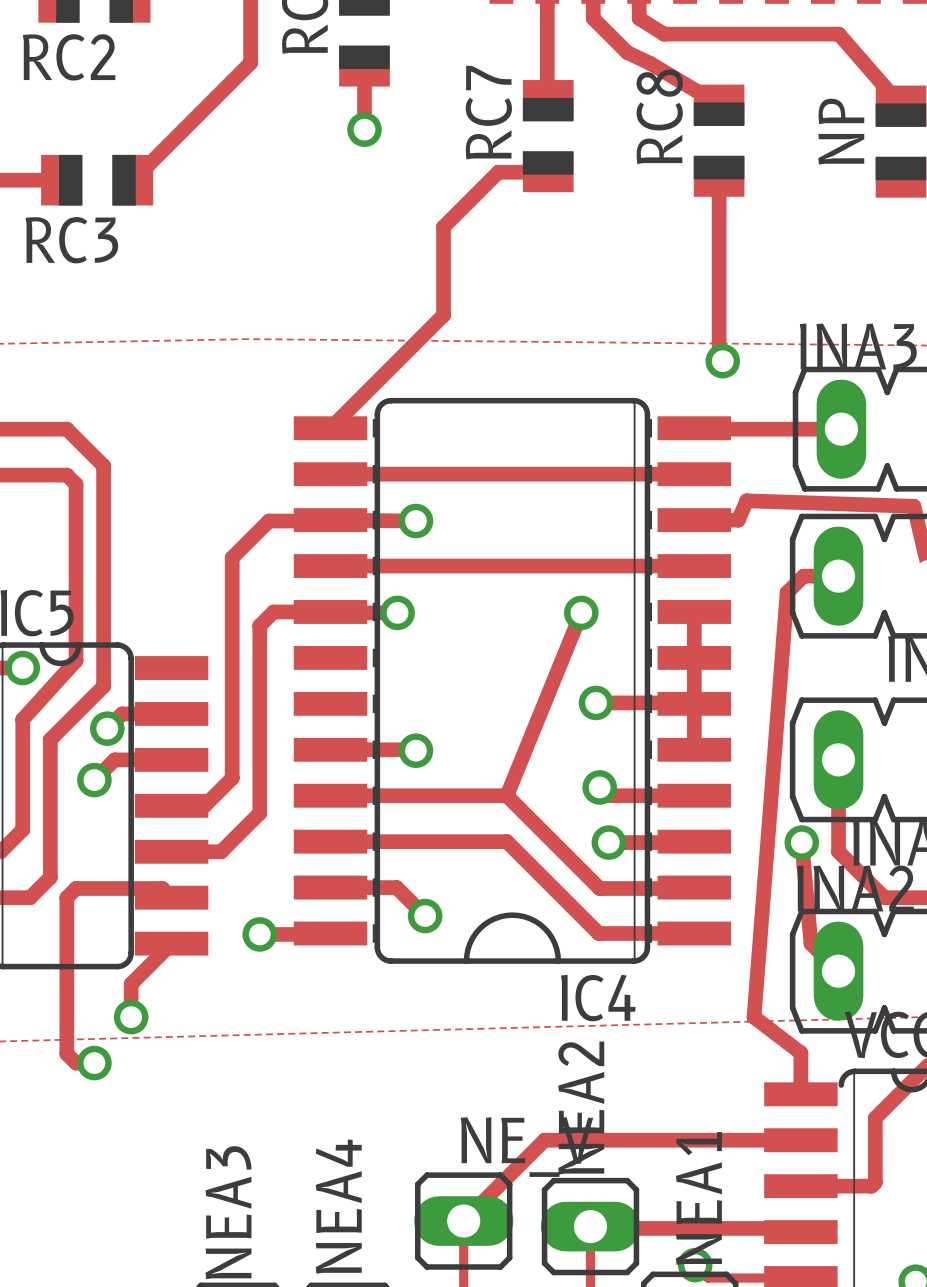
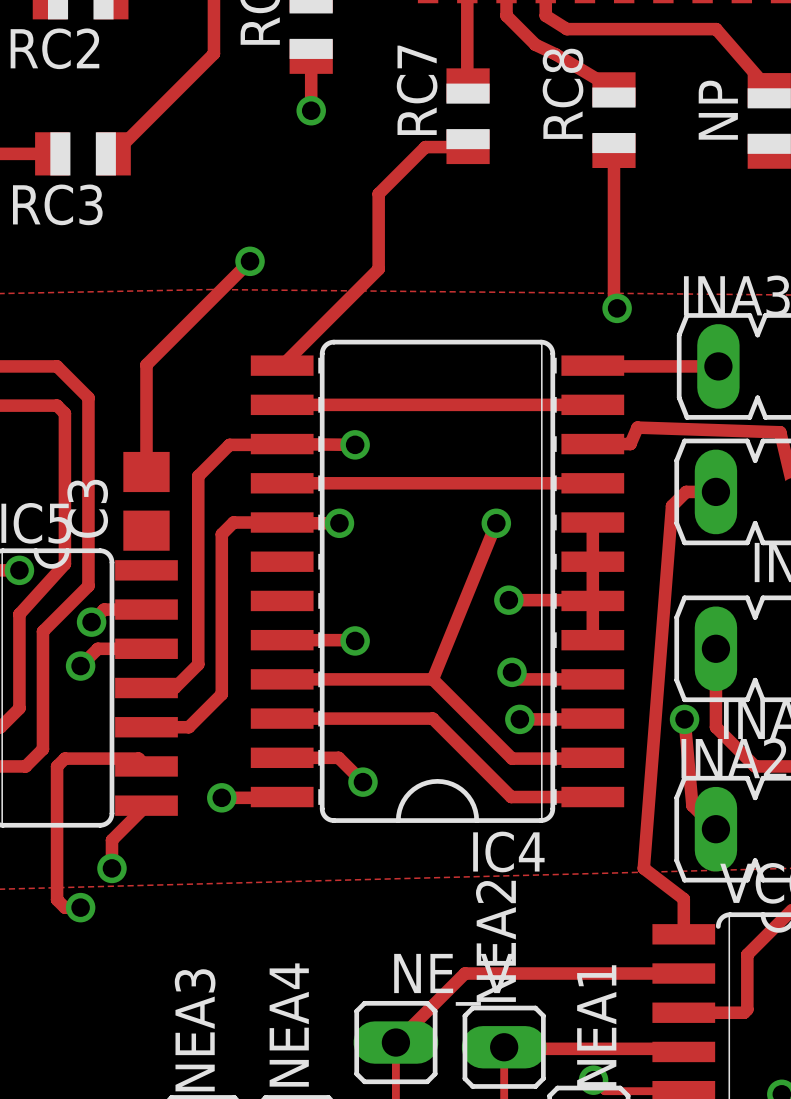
track: none -> (250, 261) (146, 364) (146, 471)
via: none -> (250, 261)
C3: none -> (146, 501)

